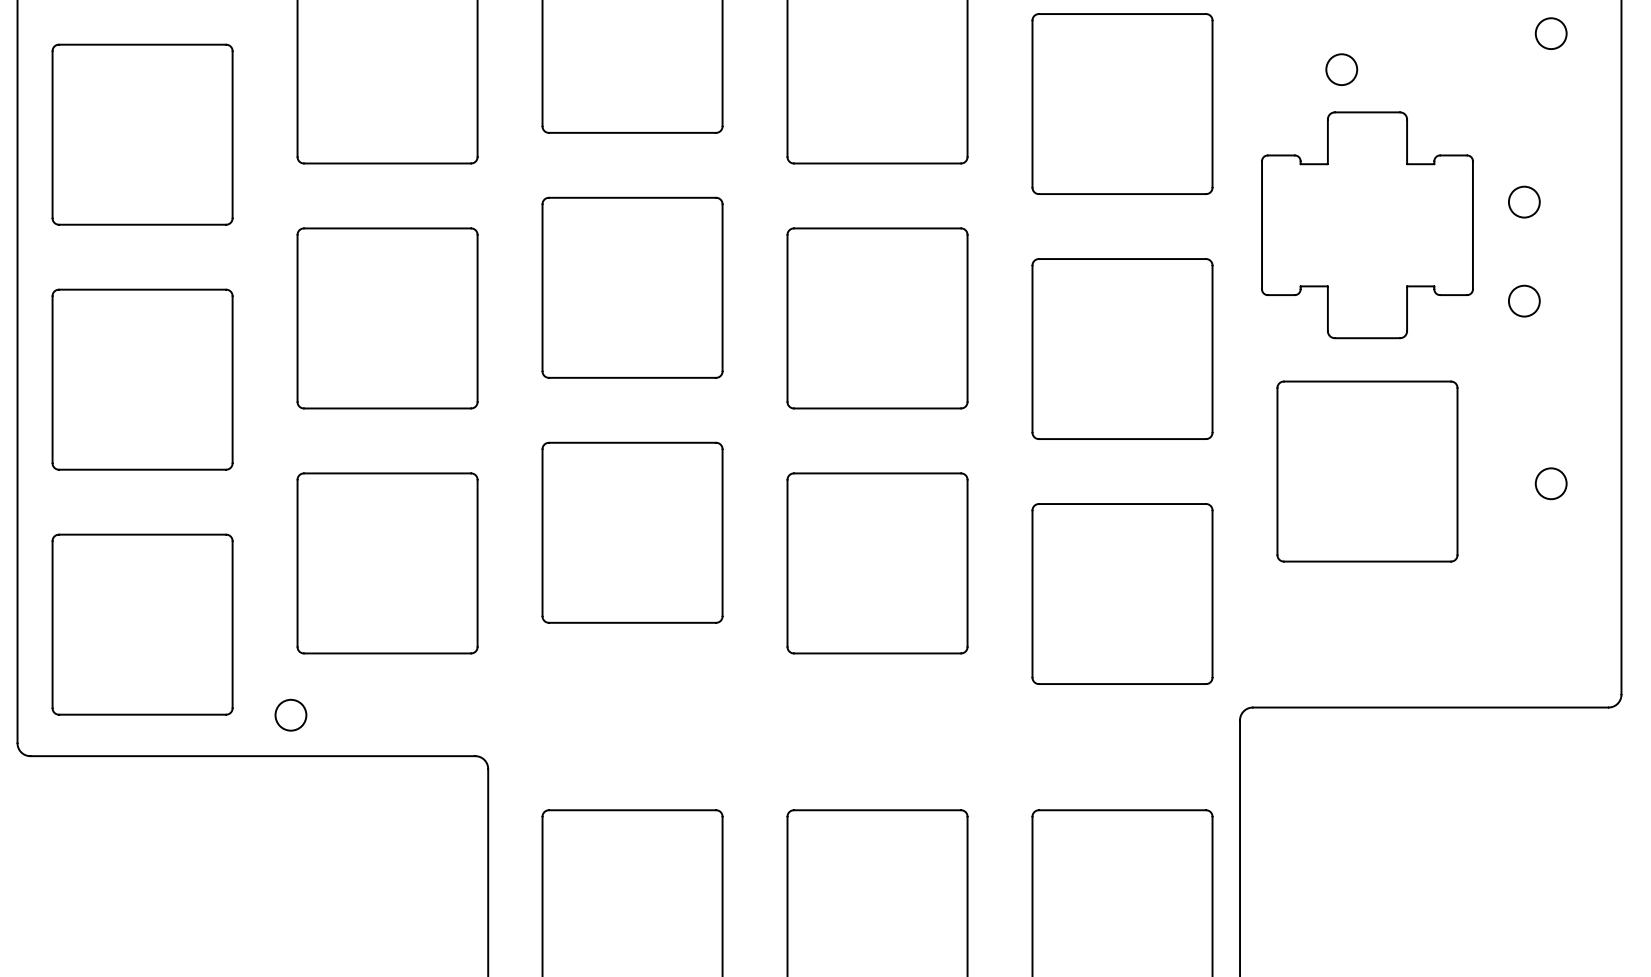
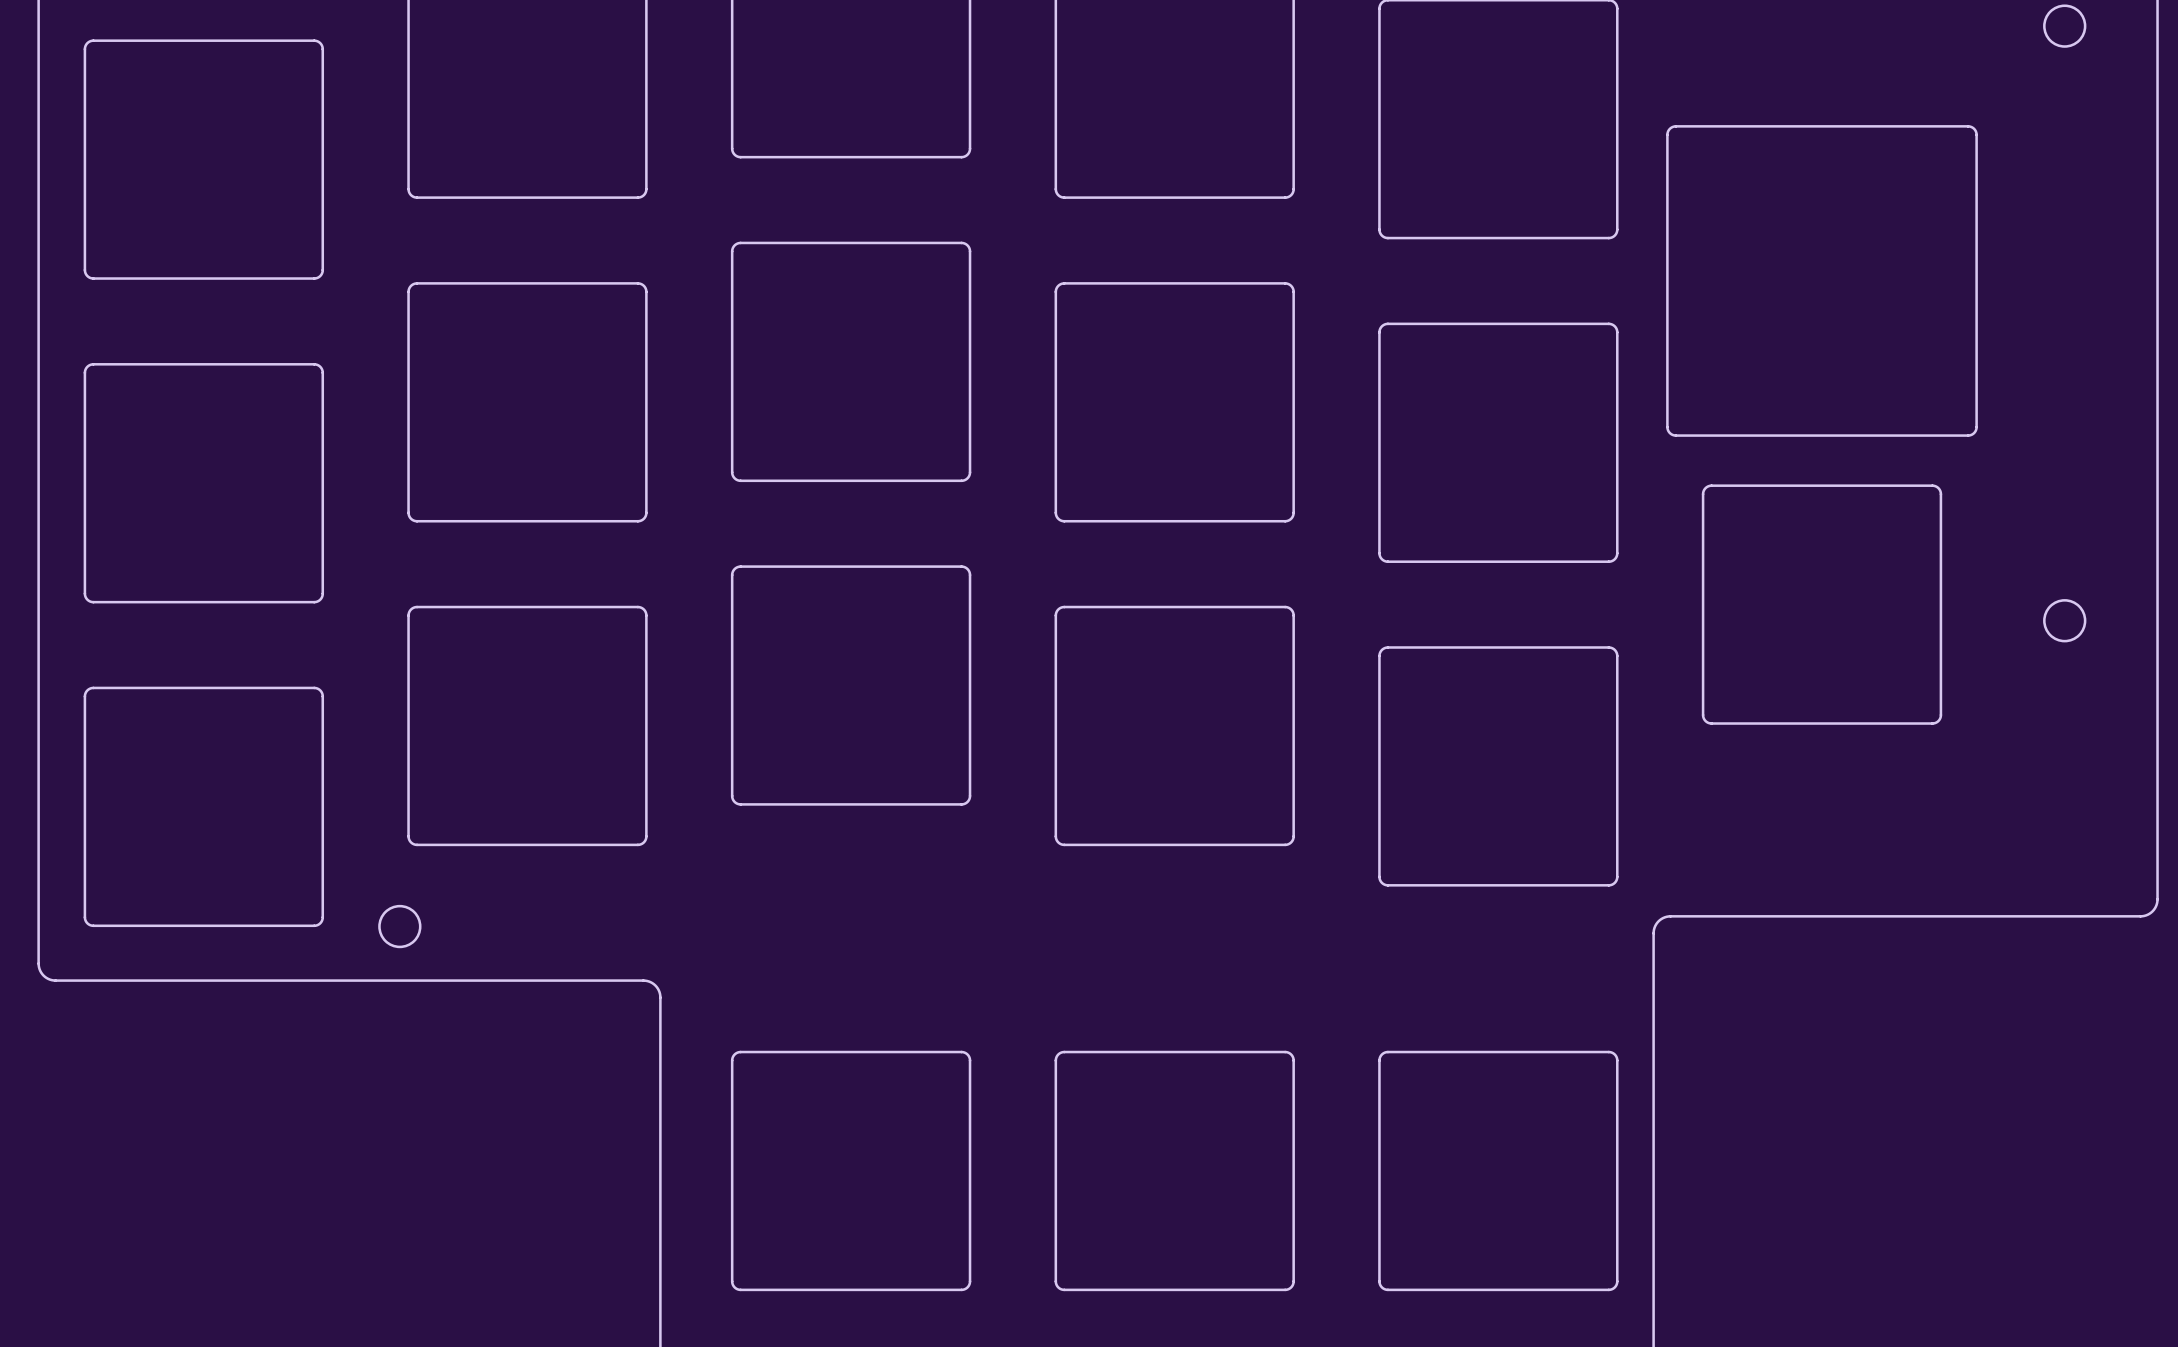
round board edge: [1325, 53, 1359, 87] -> none
board edge: (1400, 112) (1330, 113) (1327, 119) (1327, 164) (1300, 164) (1299, 158) (1295, 155) (1267, 155) (1262, 159) (1262, 291) (1267, 295) (1295, 295) (1299, 292) (1300, 286) (1327, 286) (1327, 331) (1332, 337) (1403, 337) (1407, 331) (1407, 286) (1434, 286) (1435, 292) (1439, 295) (1467, 295) (1472, 290) (1472, 159) (1467, 155) (1439, 155) (1435, 158) (1434, 164) (1407, 164) (1407, 118) (1405, 114) (1400, 112) -> (1968, 126) (1974, 128) (1976, 134) (1976, 427) (1974, 433) (1968, 435) (1675, 435) (1669, 433) (1667, 427) (1667, 134) (1669, 128) (1675, 126) (1968, 126)
round board edge: [1507, 185, 1541, 219] -> none
round board edge: [1507, 284, 1541, 318] -> none

